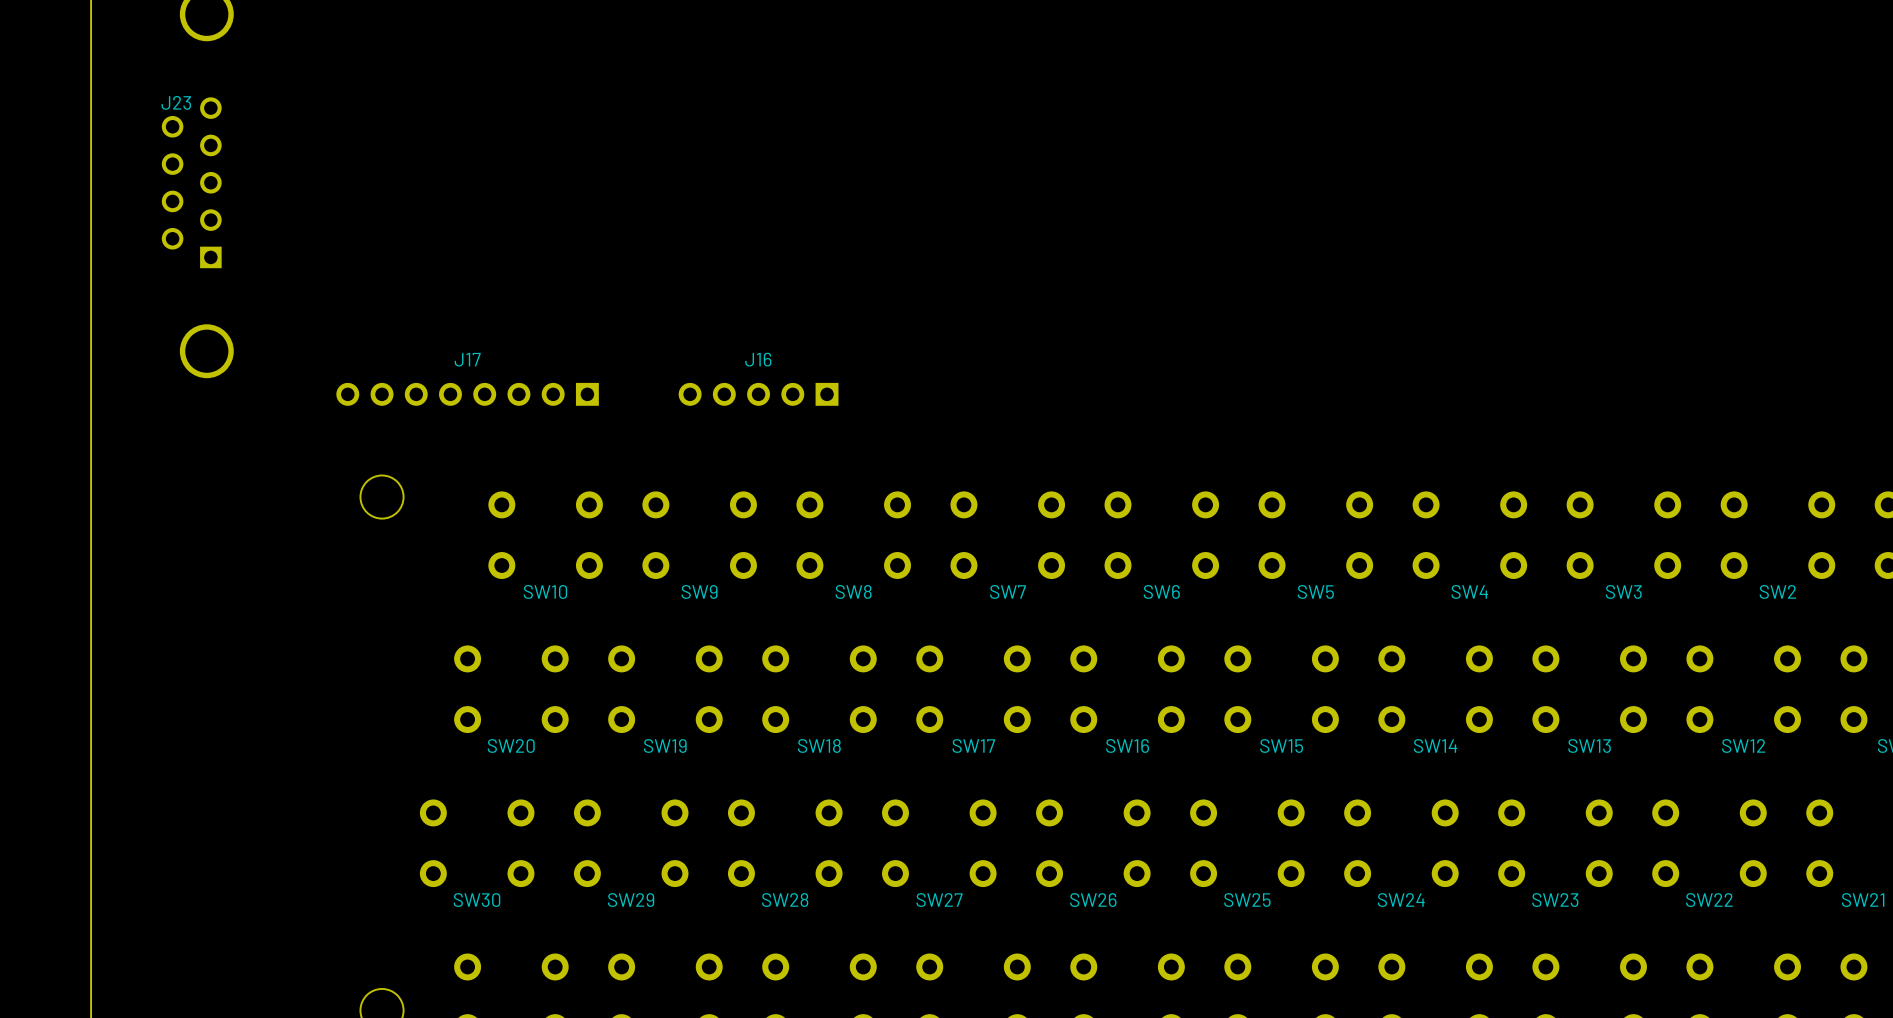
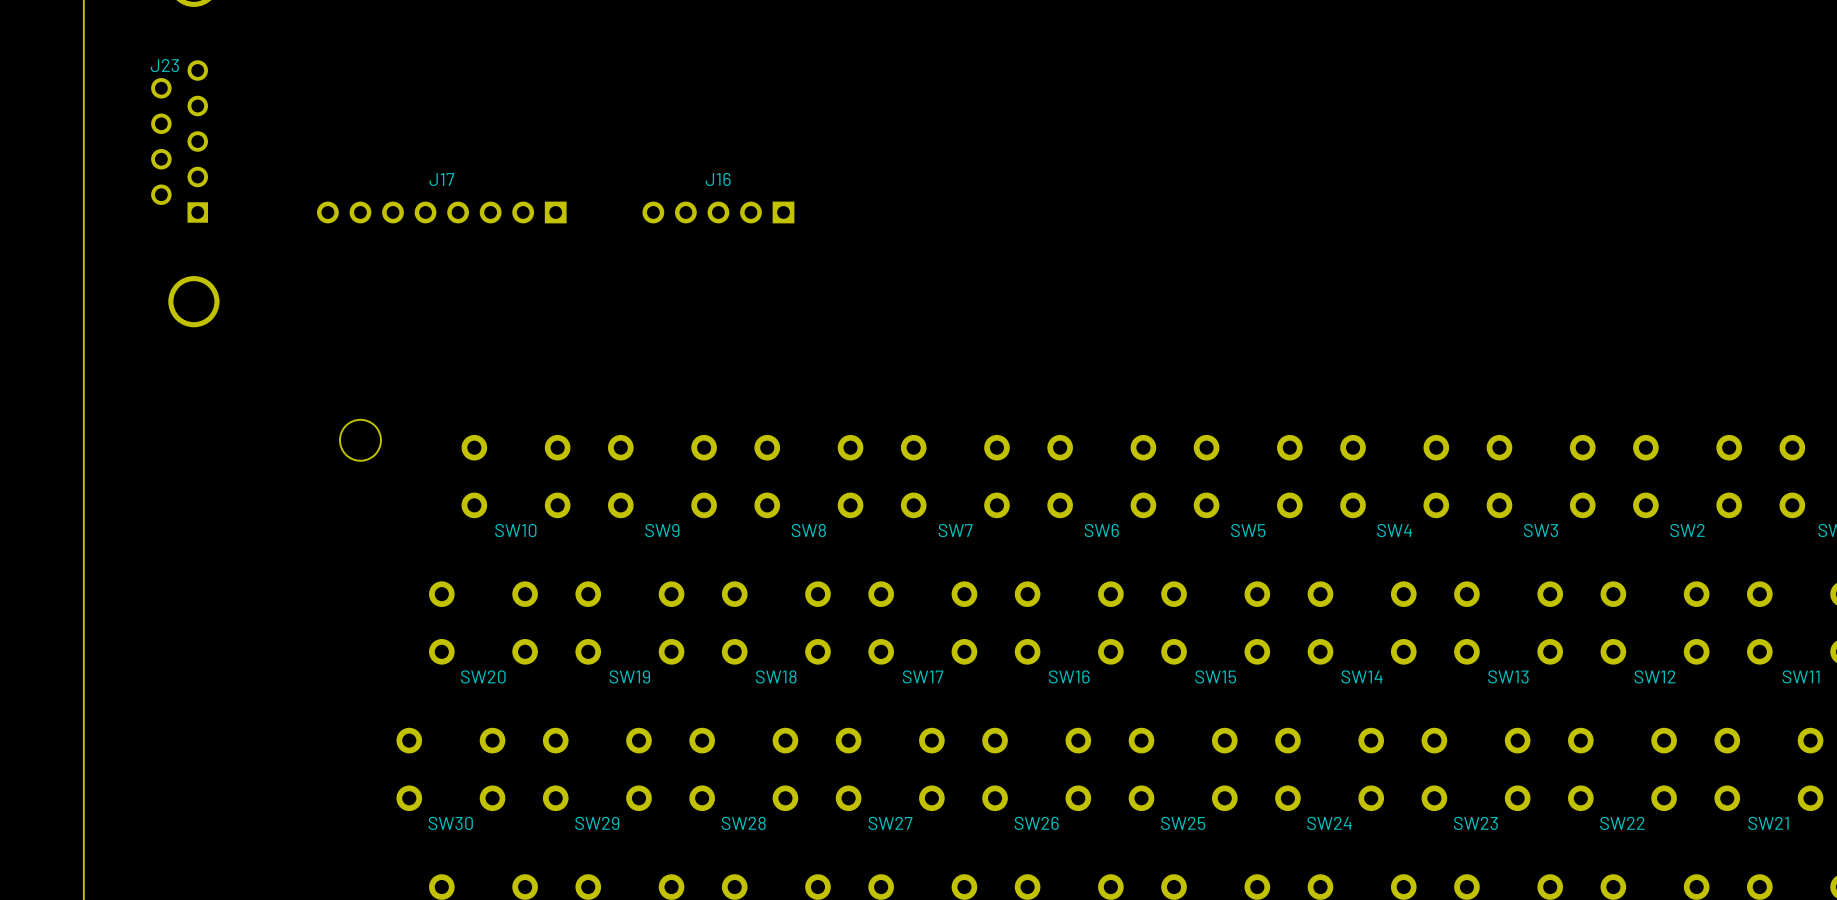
J17 position: (467, 394) -> (441, 212)
J16 position: (758, 394) -> (718, 212)

